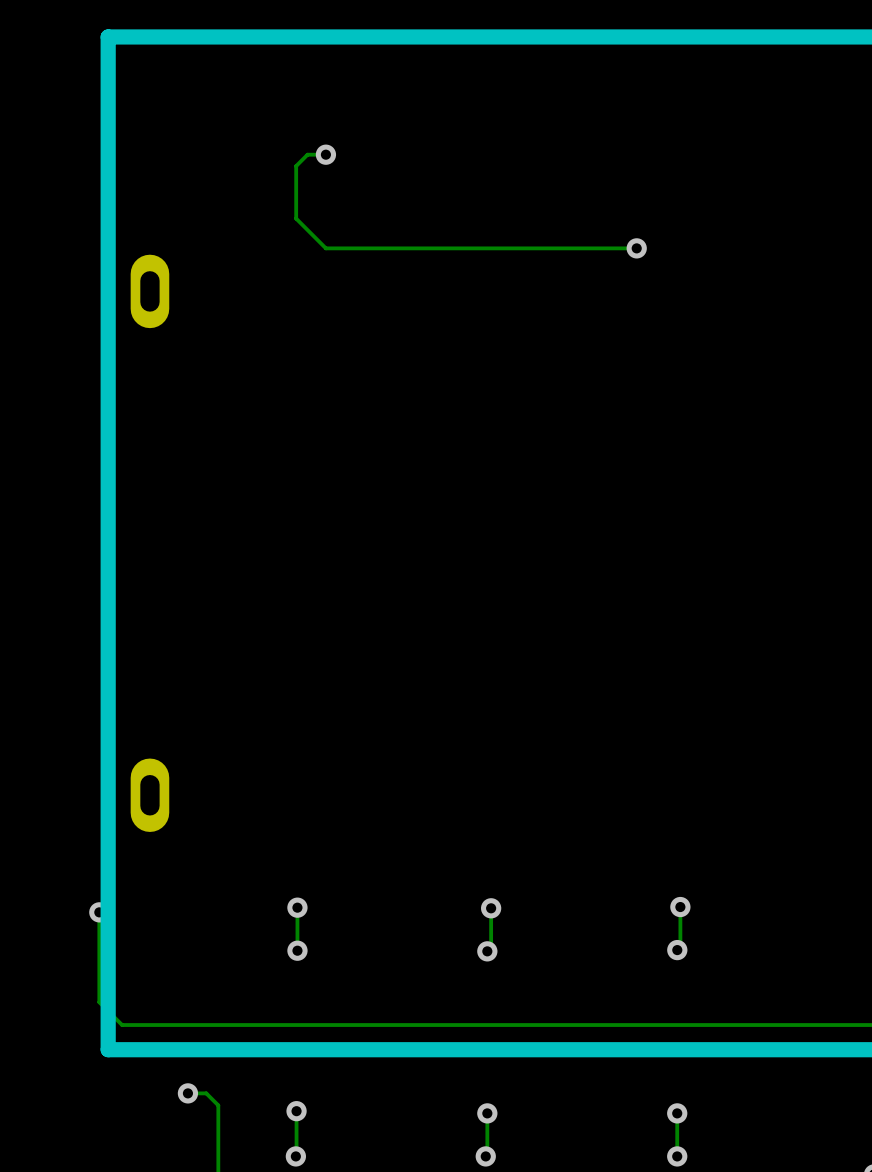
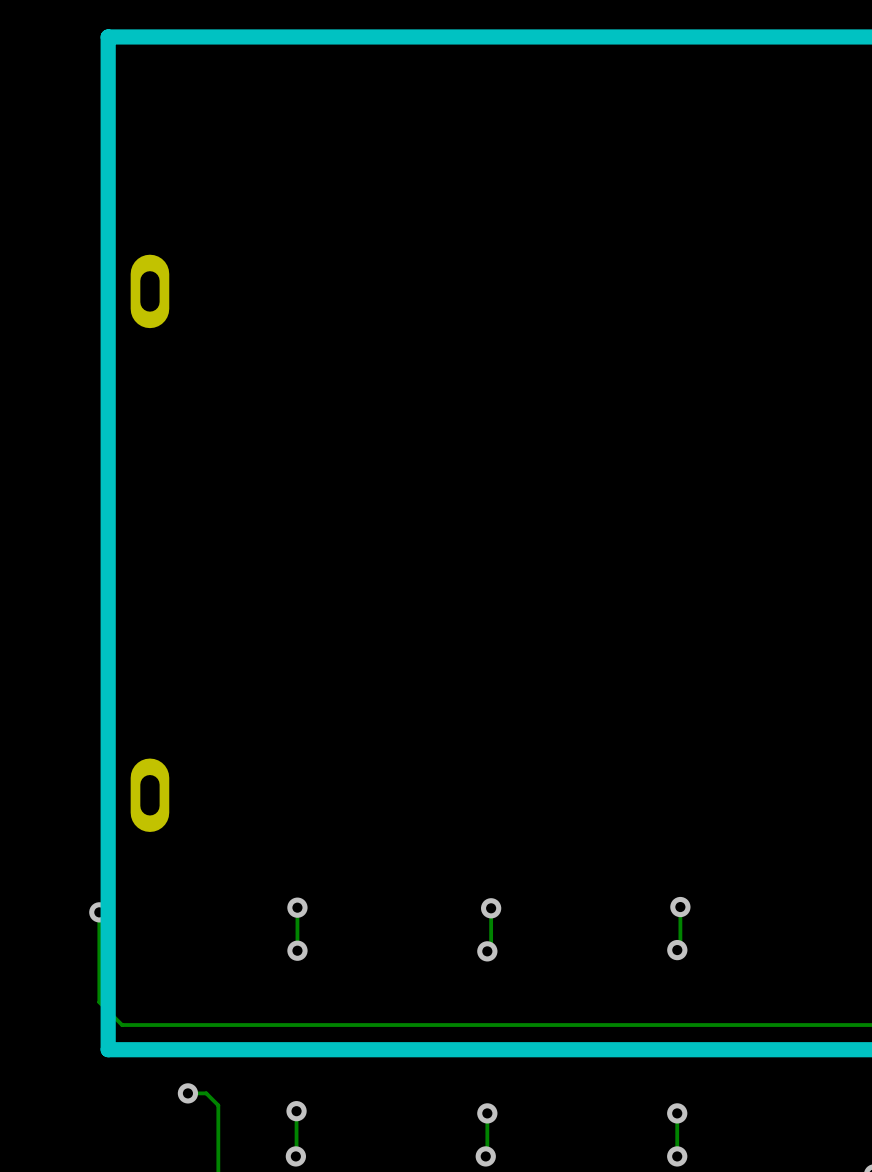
track: (325, 154) (307, 154) (296, 166) (296, 218) (325, 248) (636, 248) -> none
via: (325, 154) -> none
via: (636, 248) -> none

